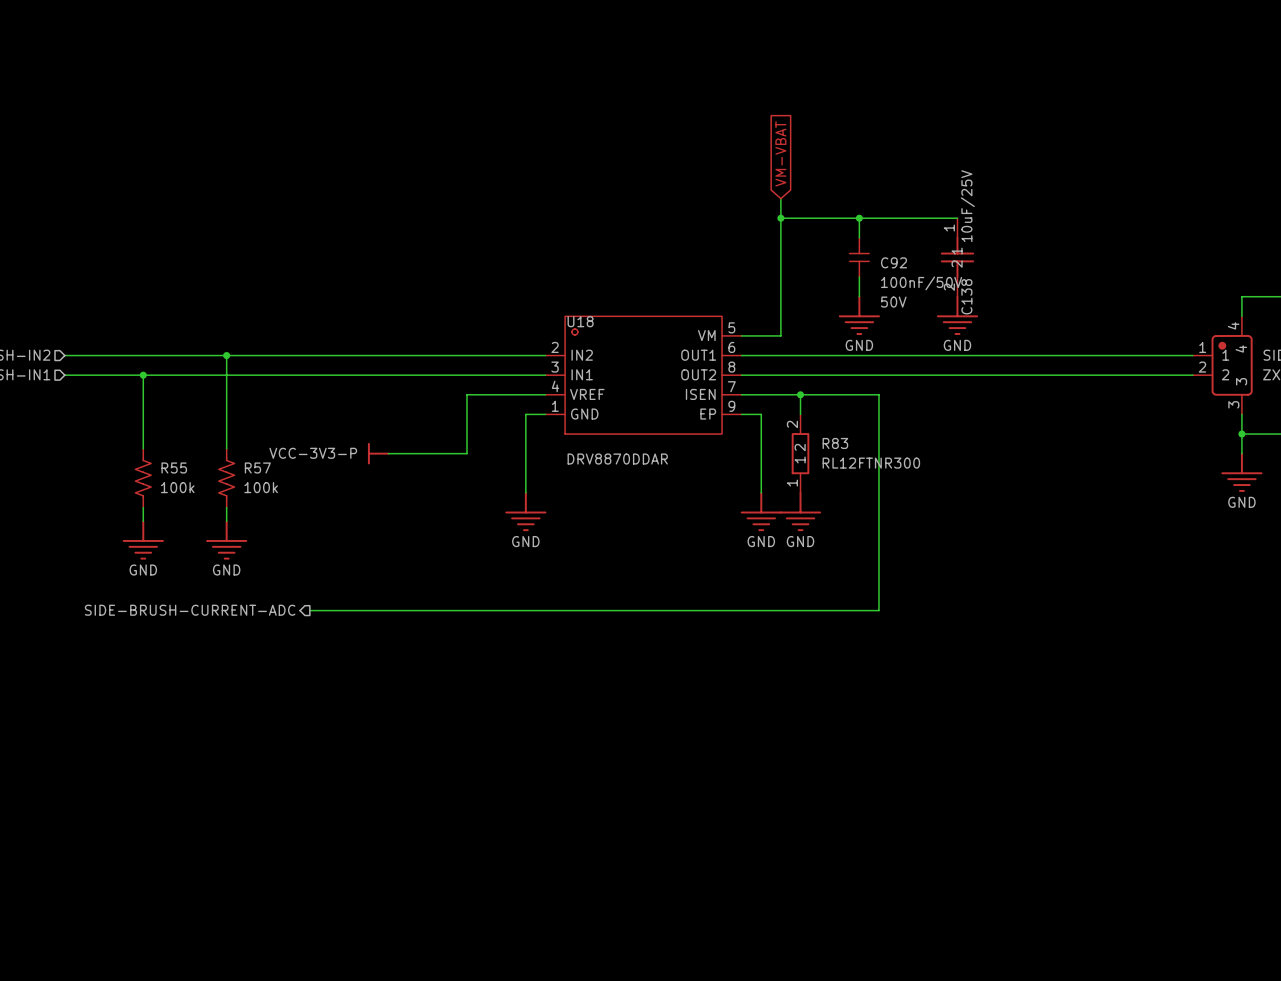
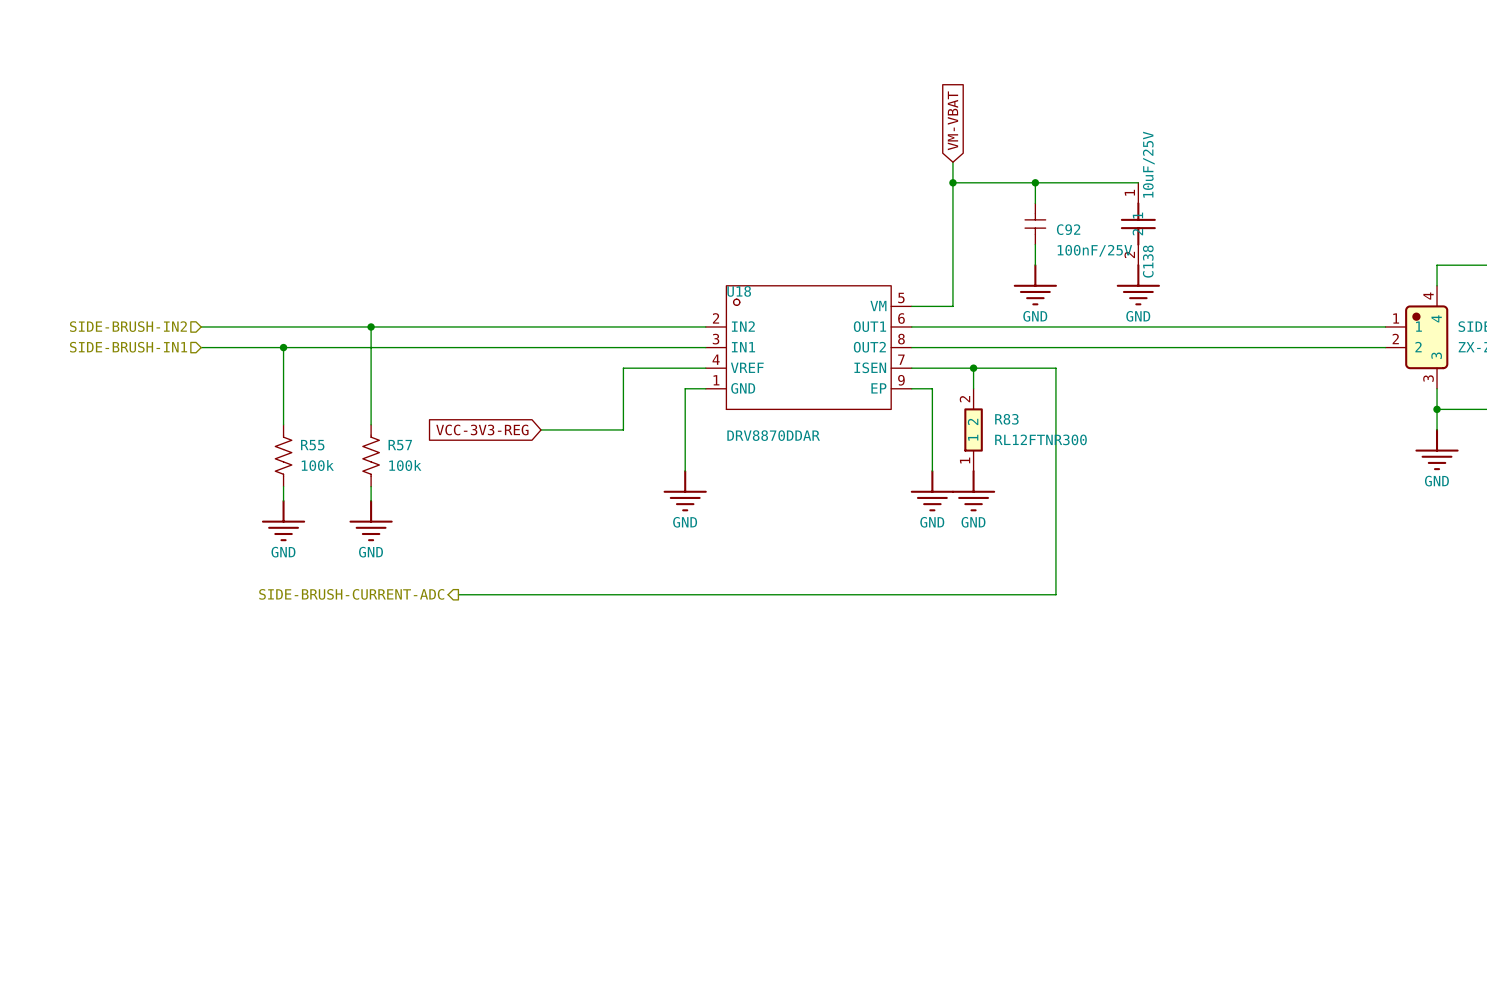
C92 value: 100nF/50V (921, 283) -> 100nF/25V (1094, 250)
C92 text: 50V (893, 302) -> none
global label: none -> VCC-3V3-REG (482, 429)
power symbol: VCC-3V3-P (378, 453) -> none

